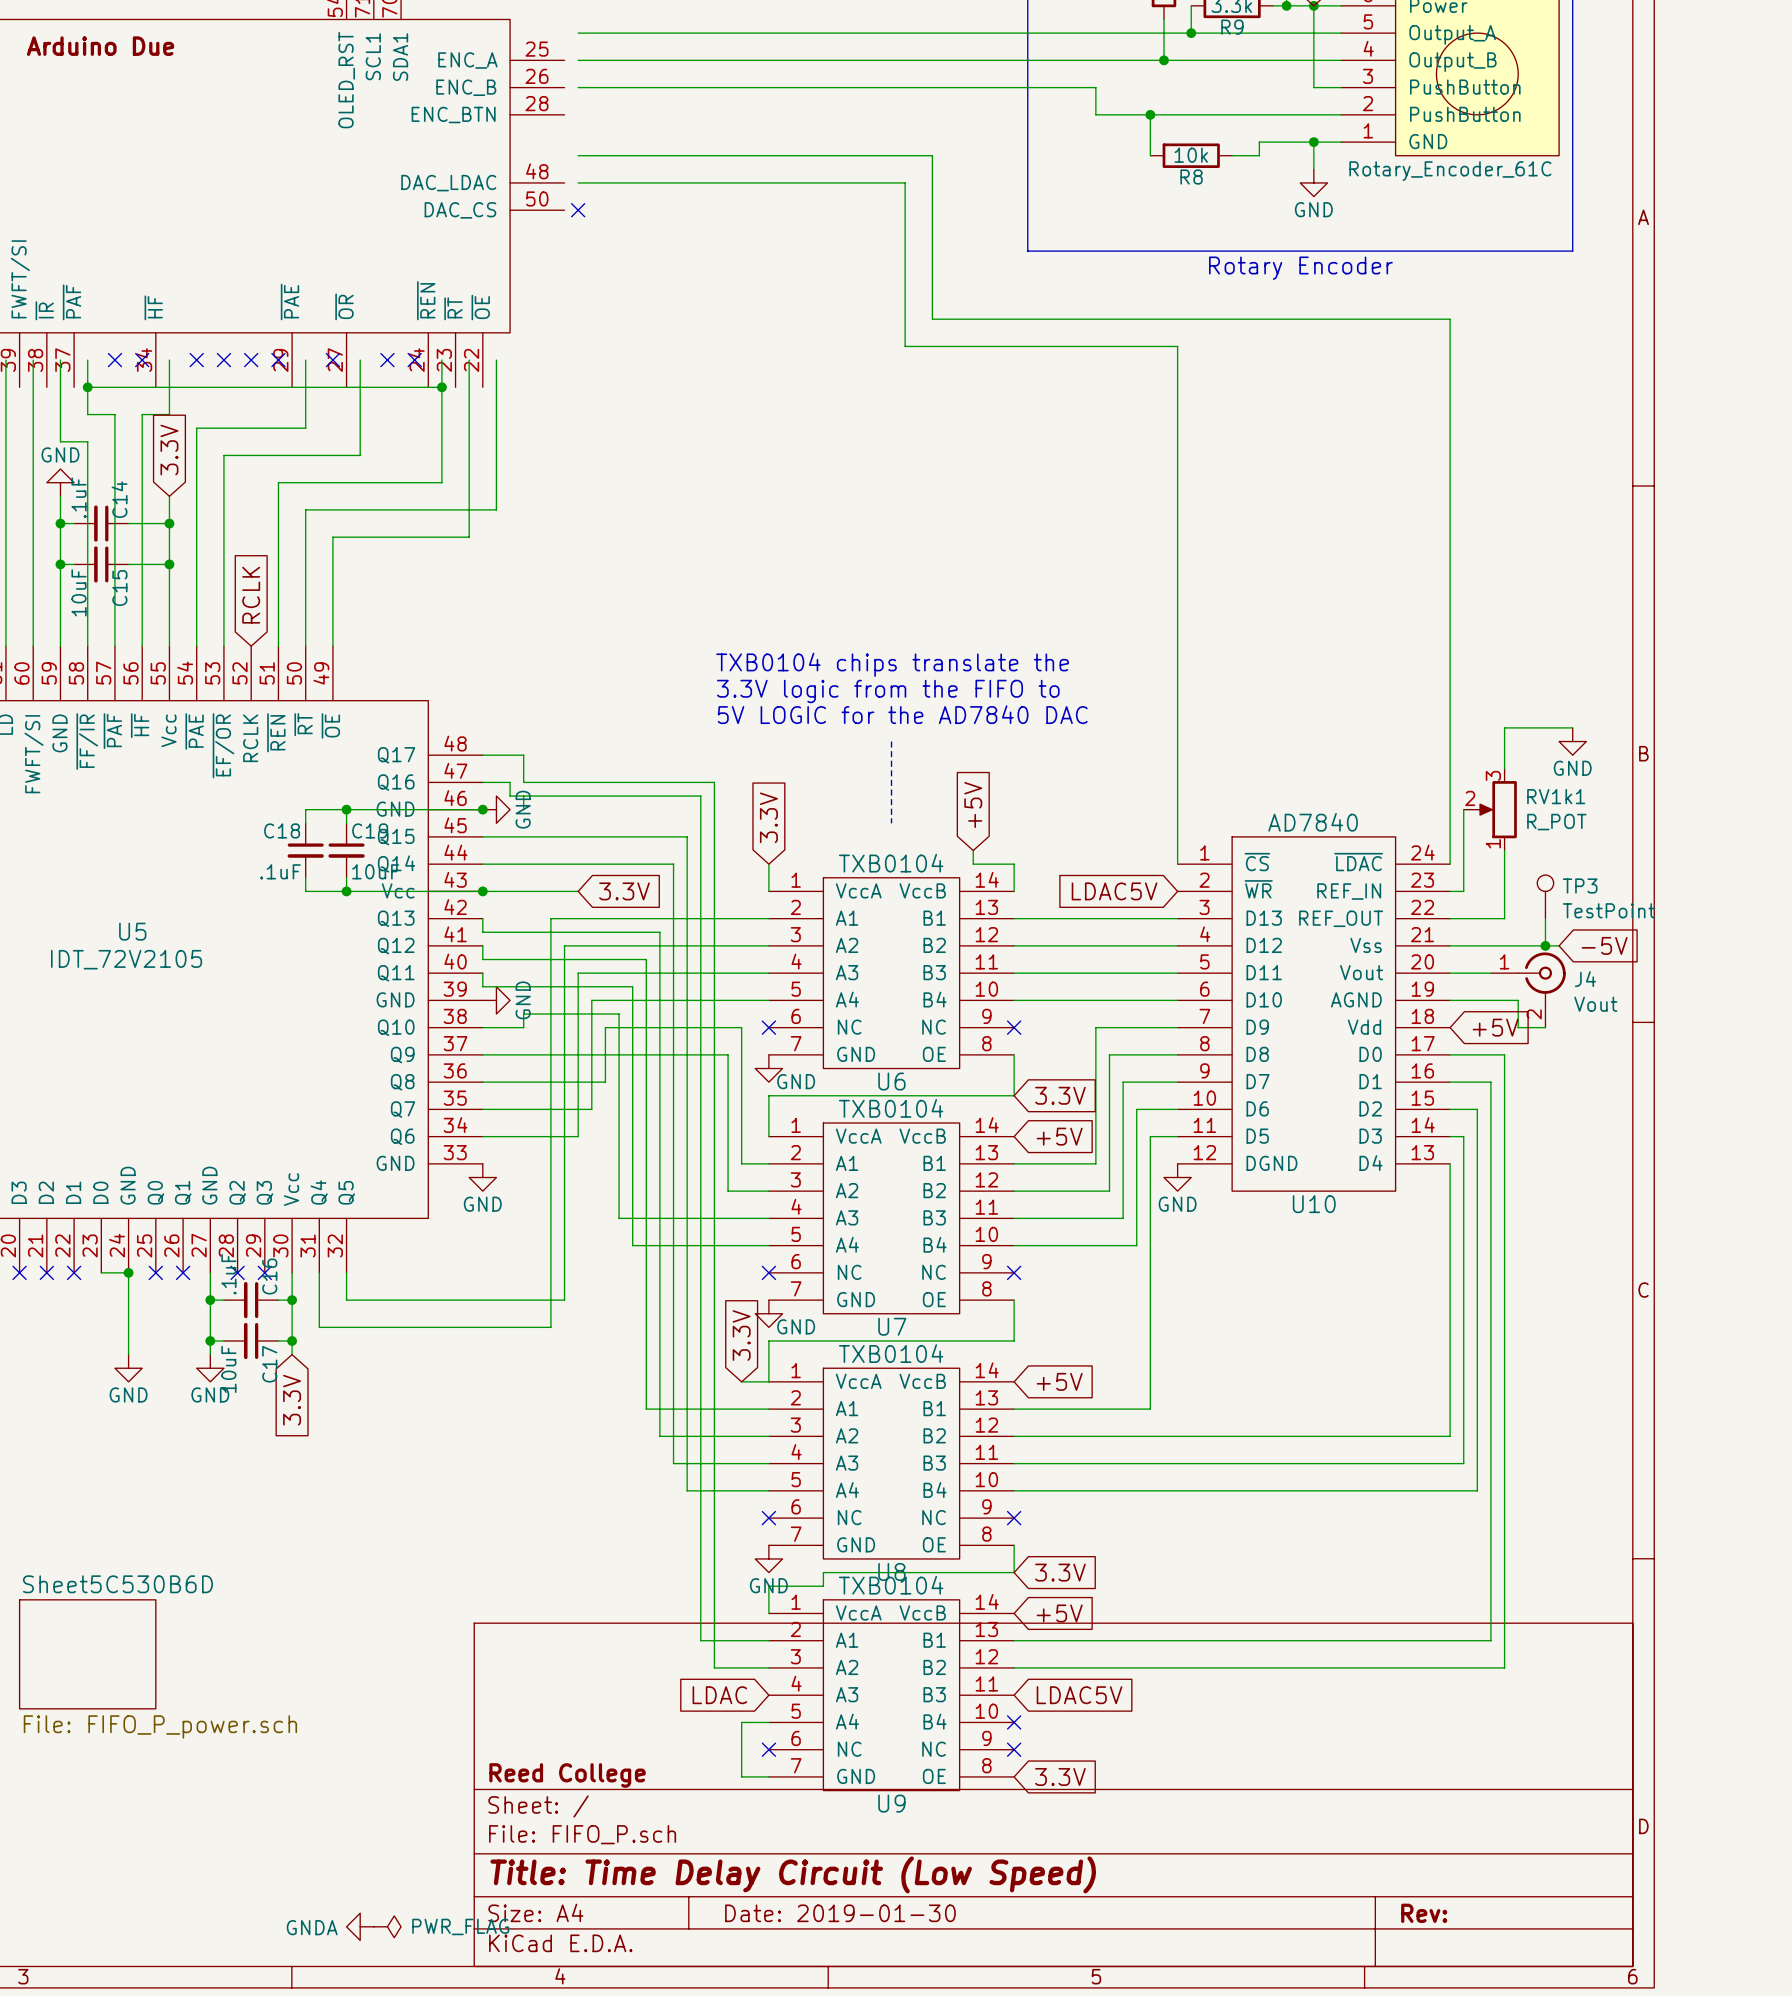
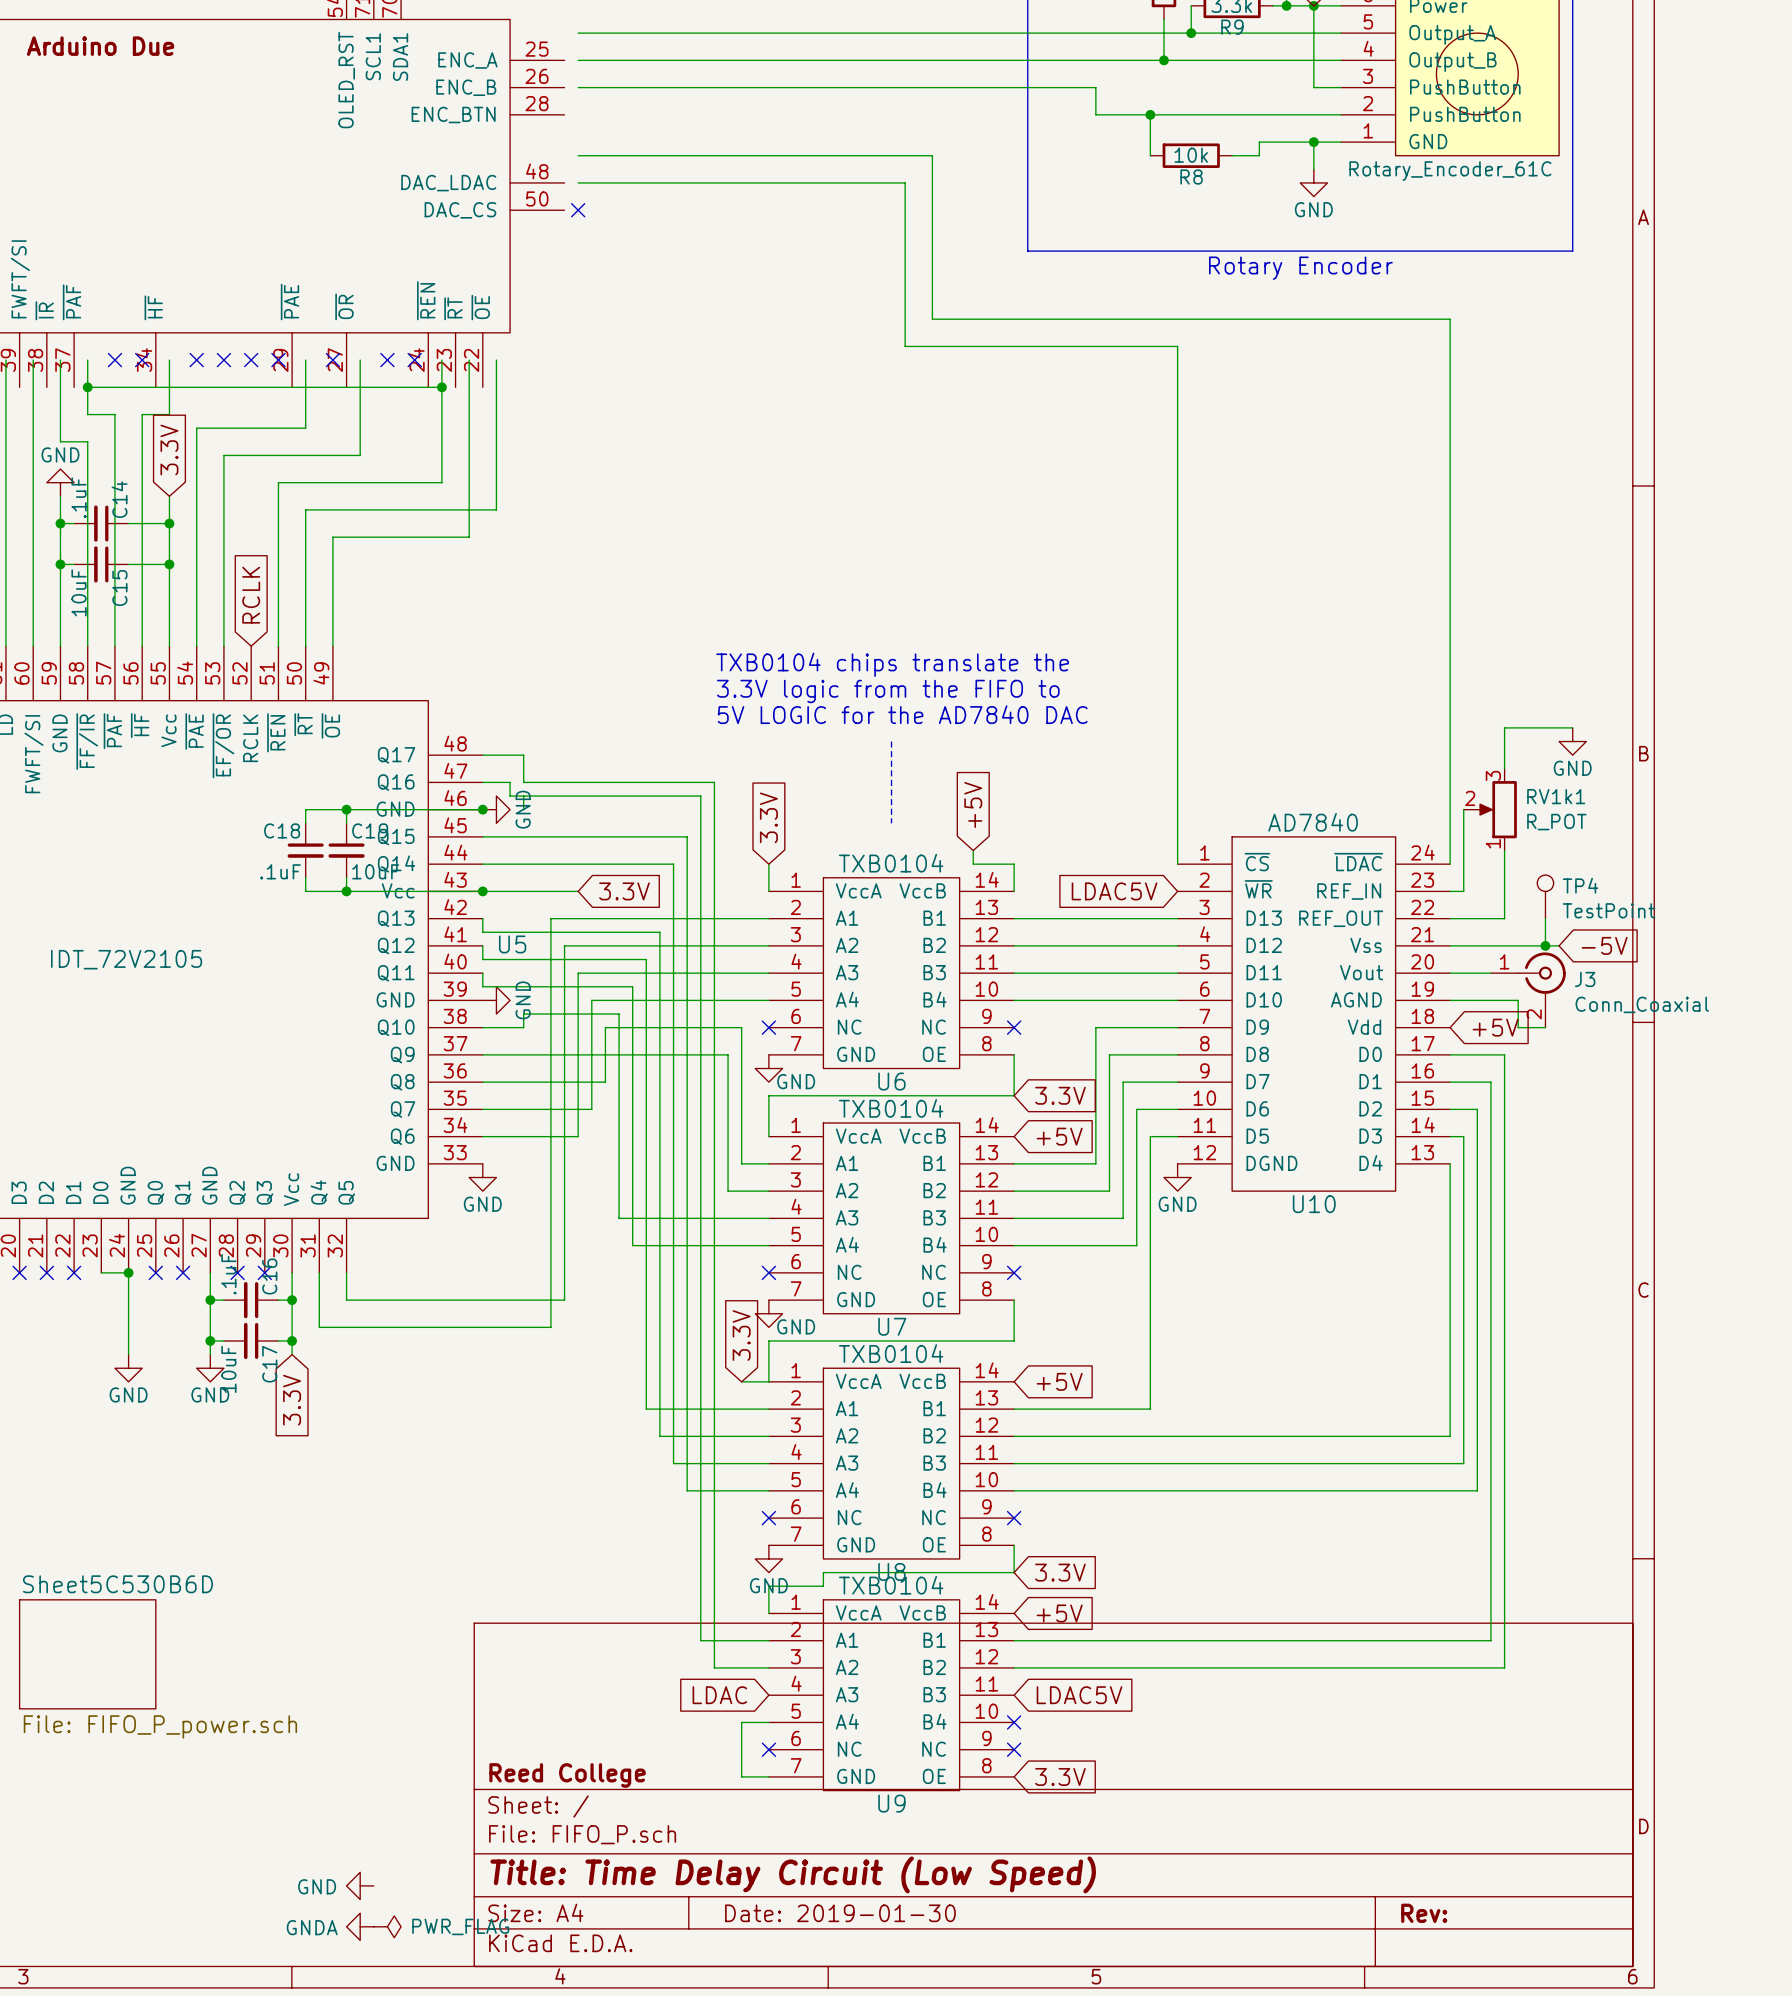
TP3 name: TP3 (1580, 885) -> TP4 (1580, 885)
U5 name position: U5 (132, 931) -> U5 (512, 944)
J4 name: J4 (1585, 979) -> J3 (1585, 979)
J4 value: Vout (1595, 1004) -> Conn_Coaxial (1642, 1004)
power symbol: none -> GND (360, 1885)

